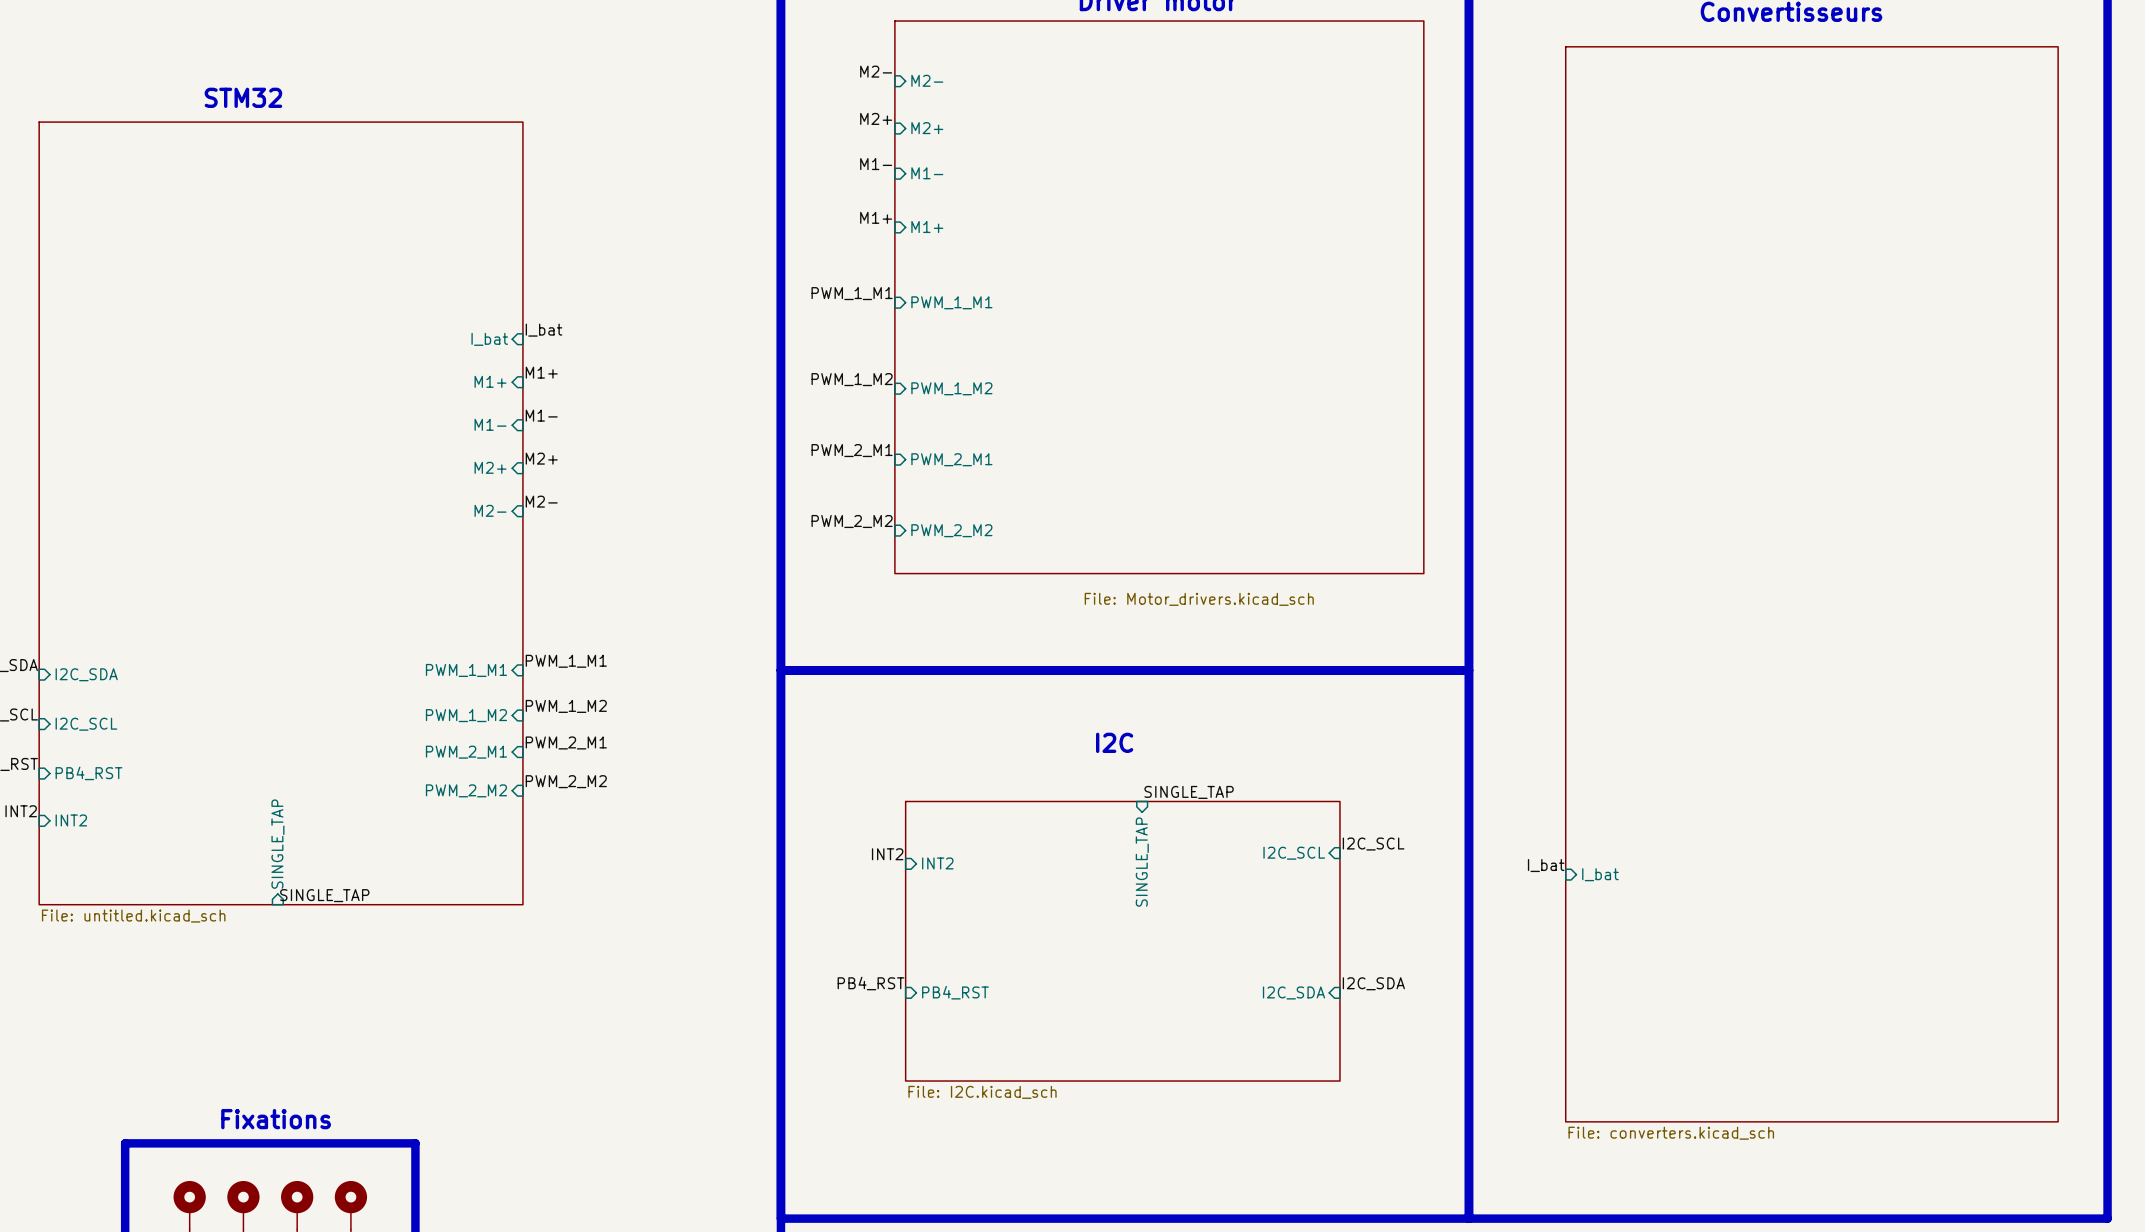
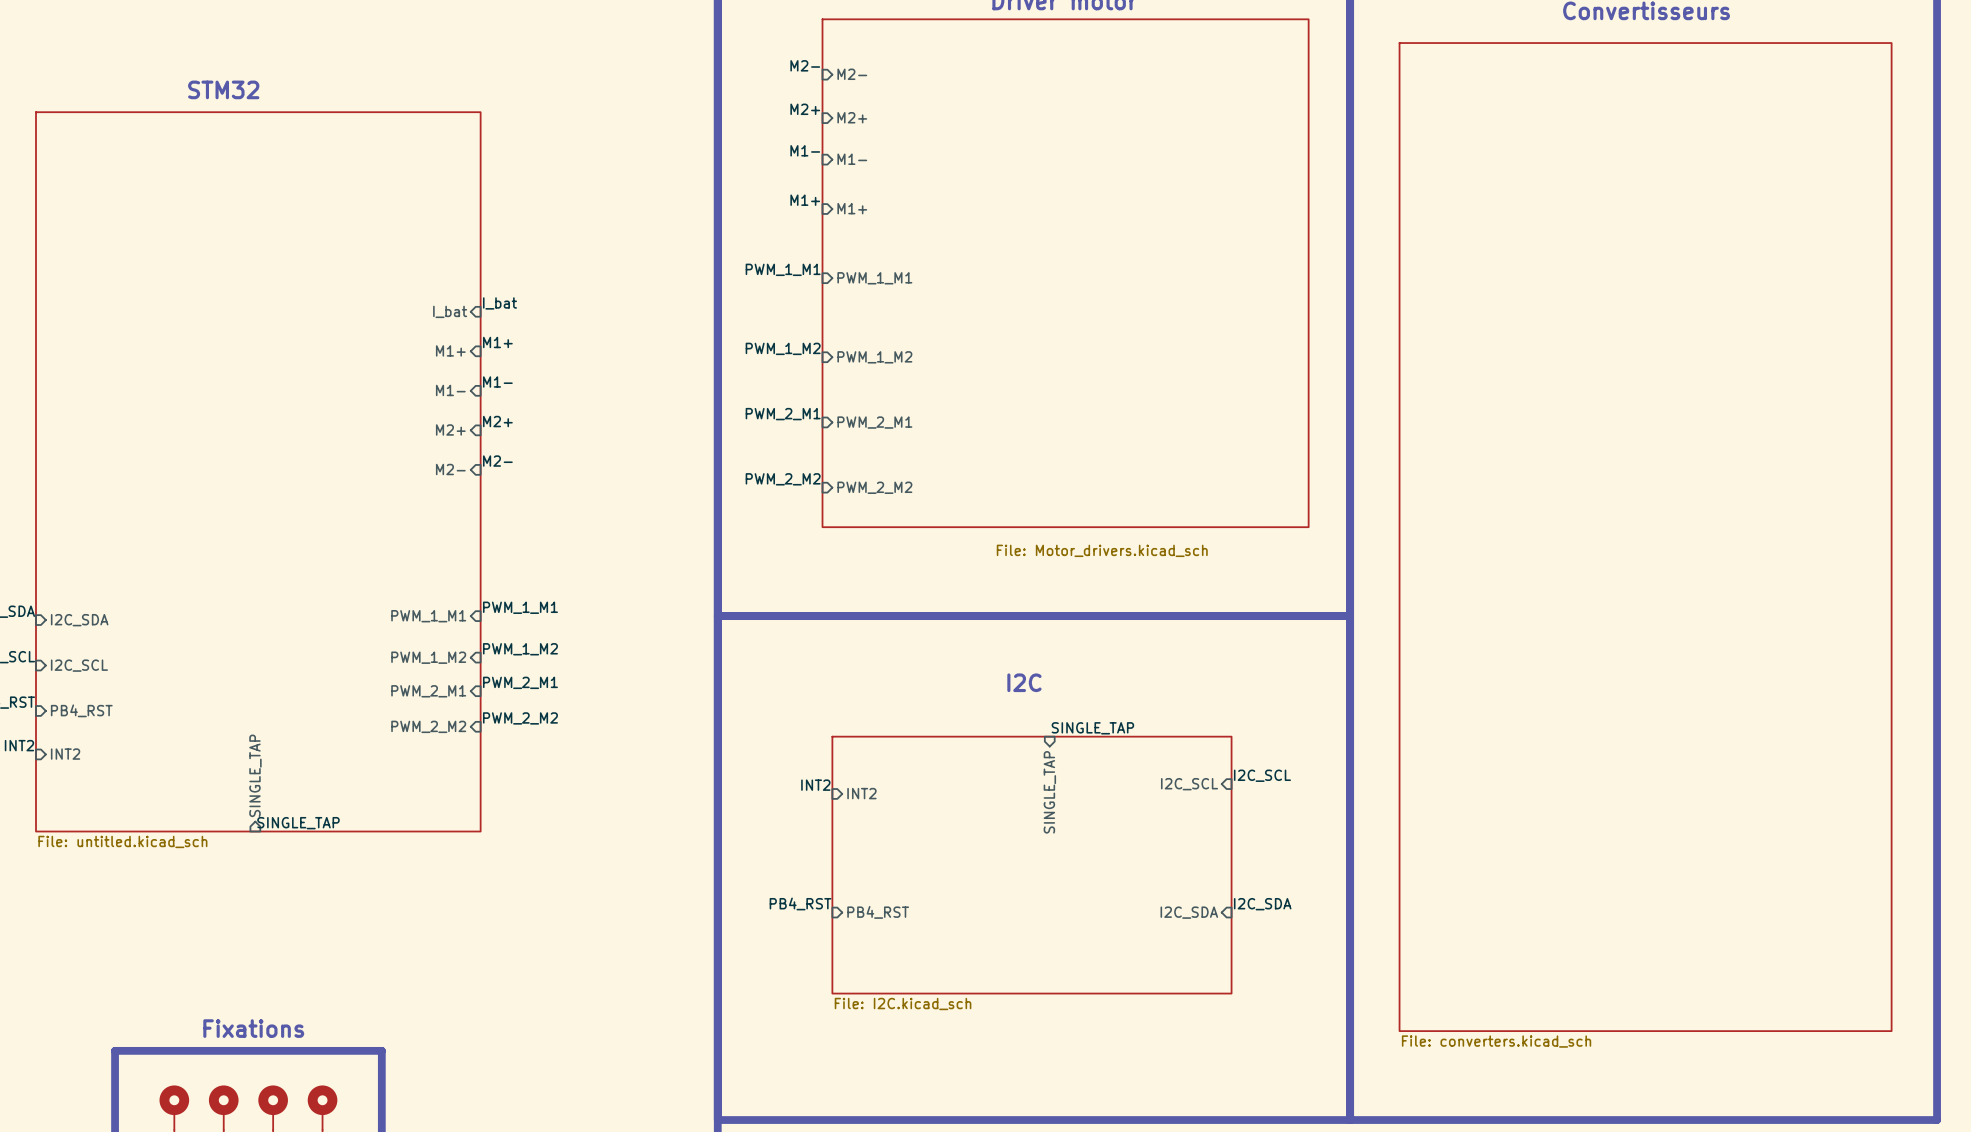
sheet: none -> File: converters.kicad_sch (1645, 537)
sheet: File: converters.kicad_sch (1811, 584) -> none
label: I_bat (1546, 865) -> none
sheet pin: I_bat (1600, 874) -> none

